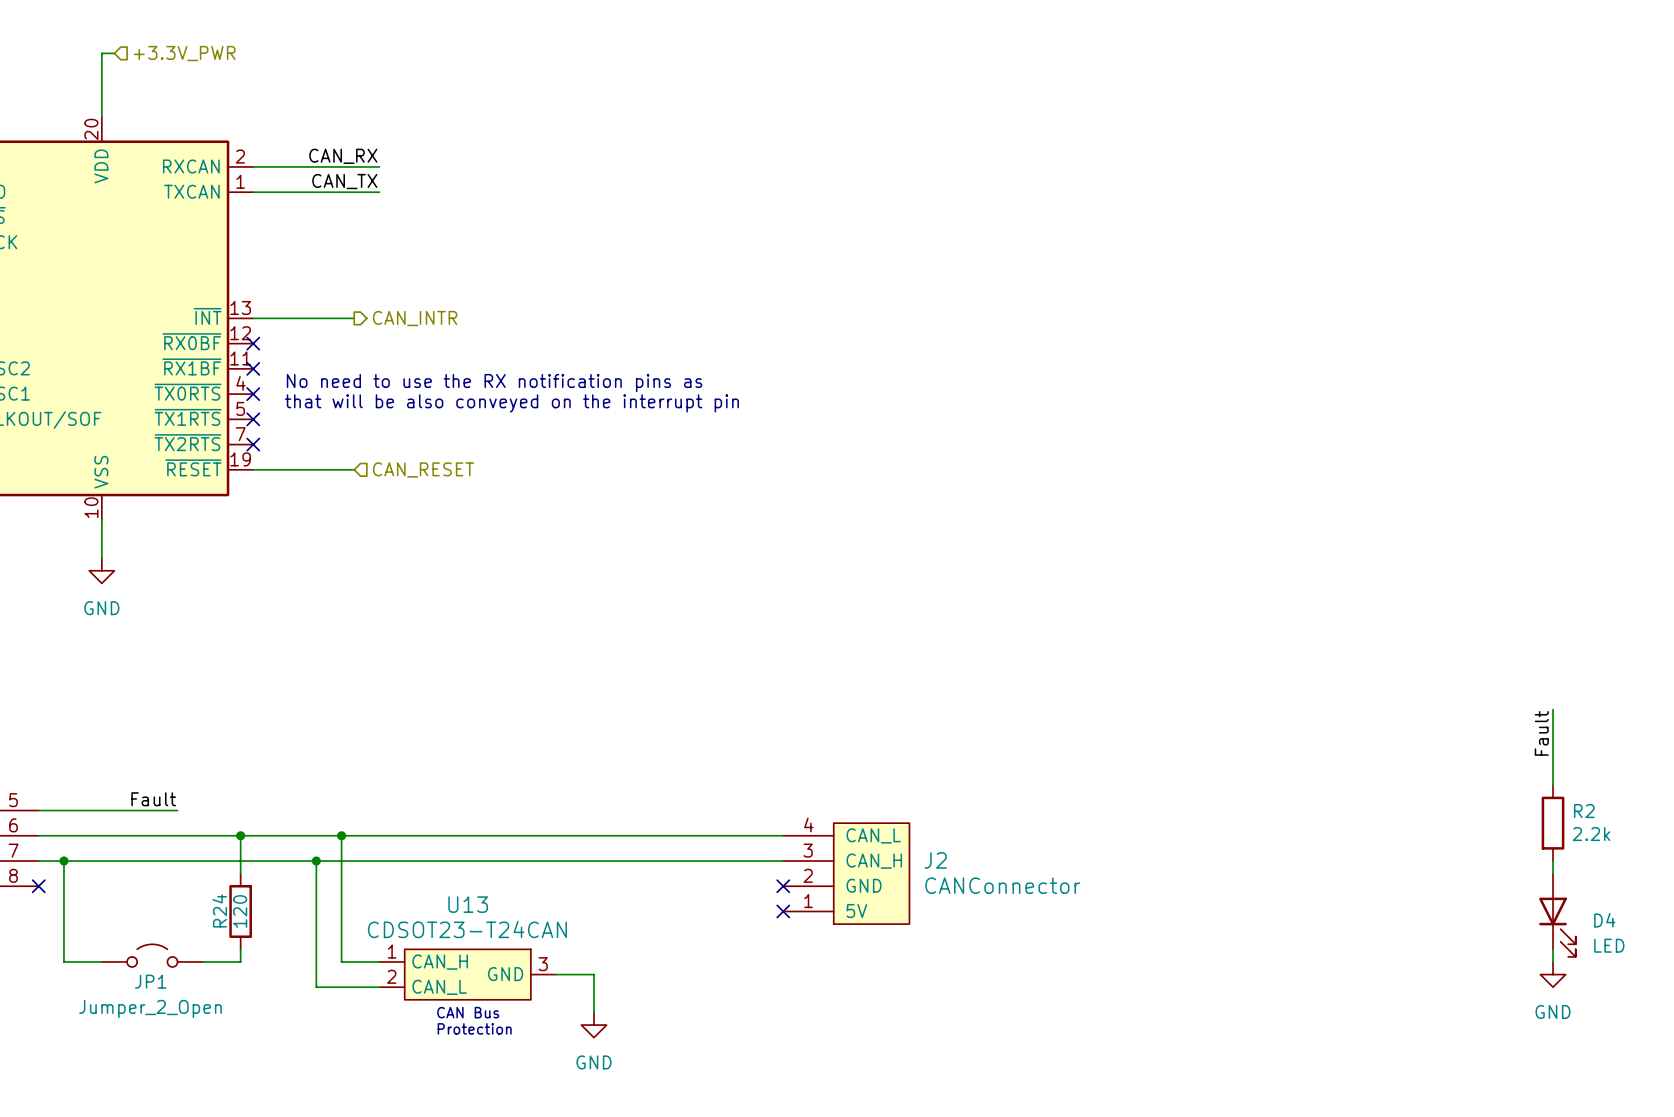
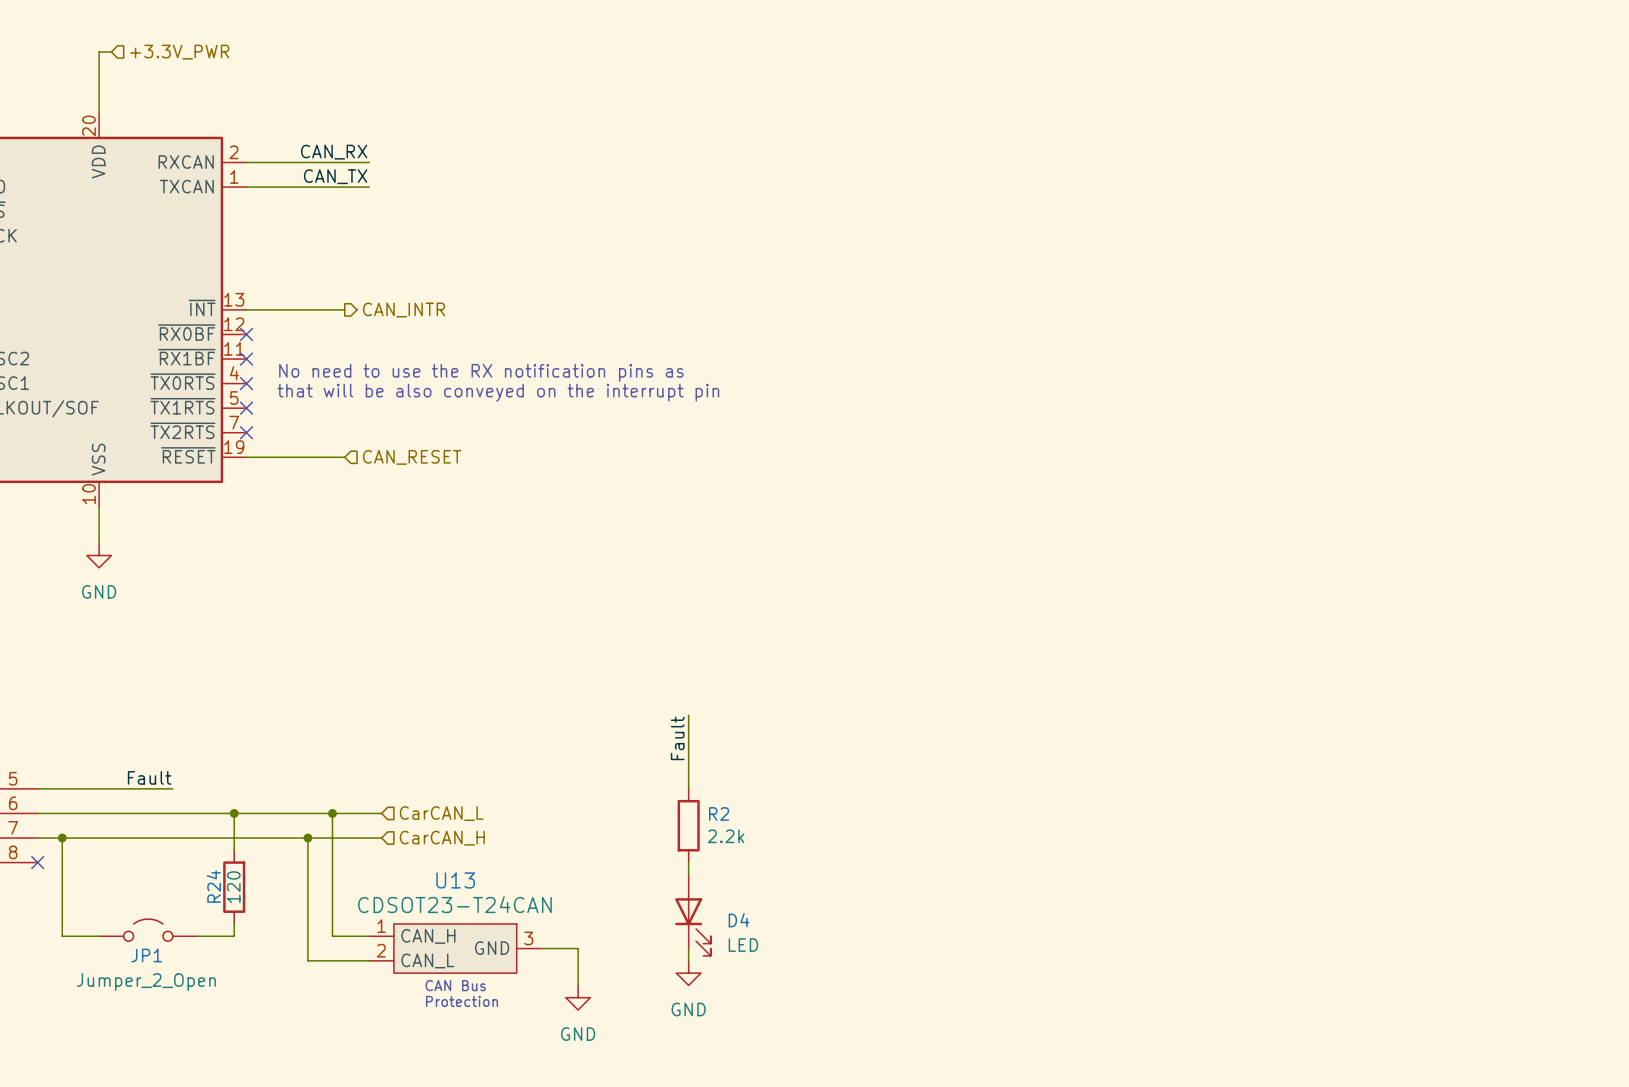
wire: (1553, 709) (1553, 785) -> none
label: Fault (1541, 733) -> none
wire: none -> (688, 715) (688, 788)
label: none -> Fault (677, 738)
R2 position: (1553, 823) -> (688, 825)
wire: (392, 835) (783, 835) -> none
hierarchical label: none -> CarCAN_L (441, 813)
wire: (392, 861) (783, 861) -> none
hierarchical label: none -> CarCAN_H (442, 838)
wire: (1553, 861) (1553, 873) -> none
J2: CANConnector (846, 873) -> none
wire: none -> (688, 862) (688, 874)
no-connect mark: (783, 886) -> none
no-connect mark: (783, 911) -> none
D4 position: (1557, 915) -> (692, 915)
wire: (1553, 949) (1553, 961) -> none
wire: none -> (688, 948) (688, 960)
power symbol: GND (1553, 974) -> none
power symbol: none -> GND (688, 973)

